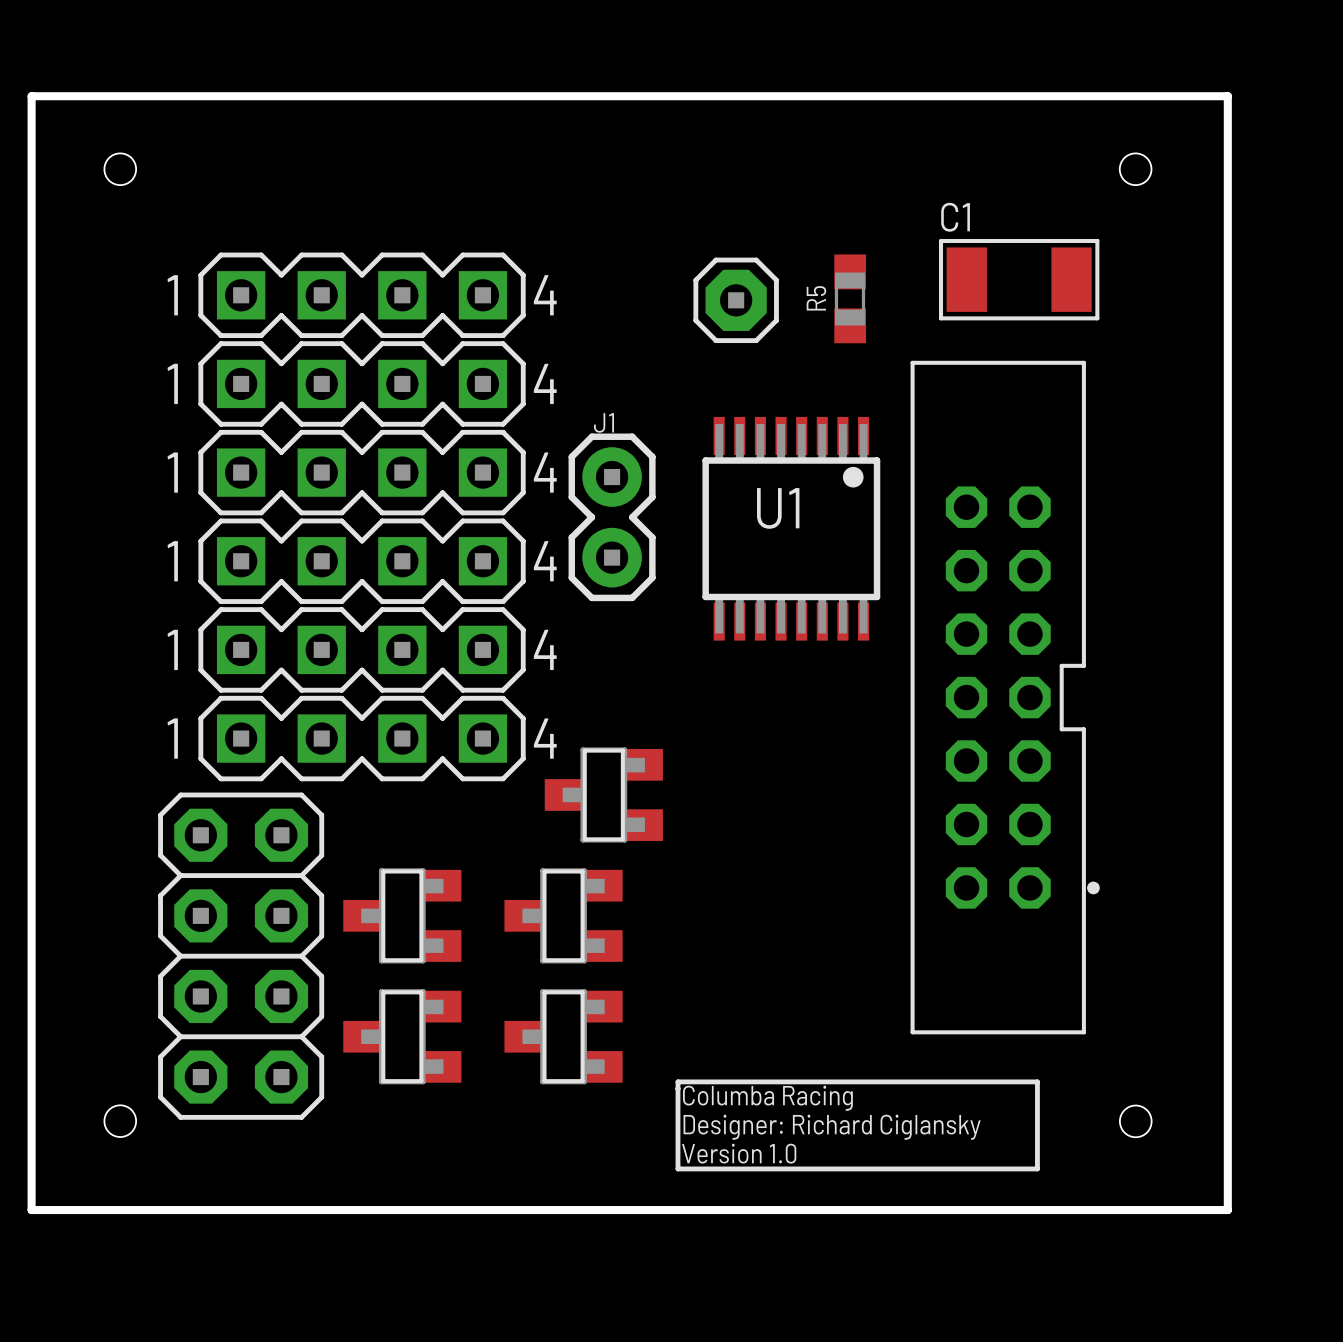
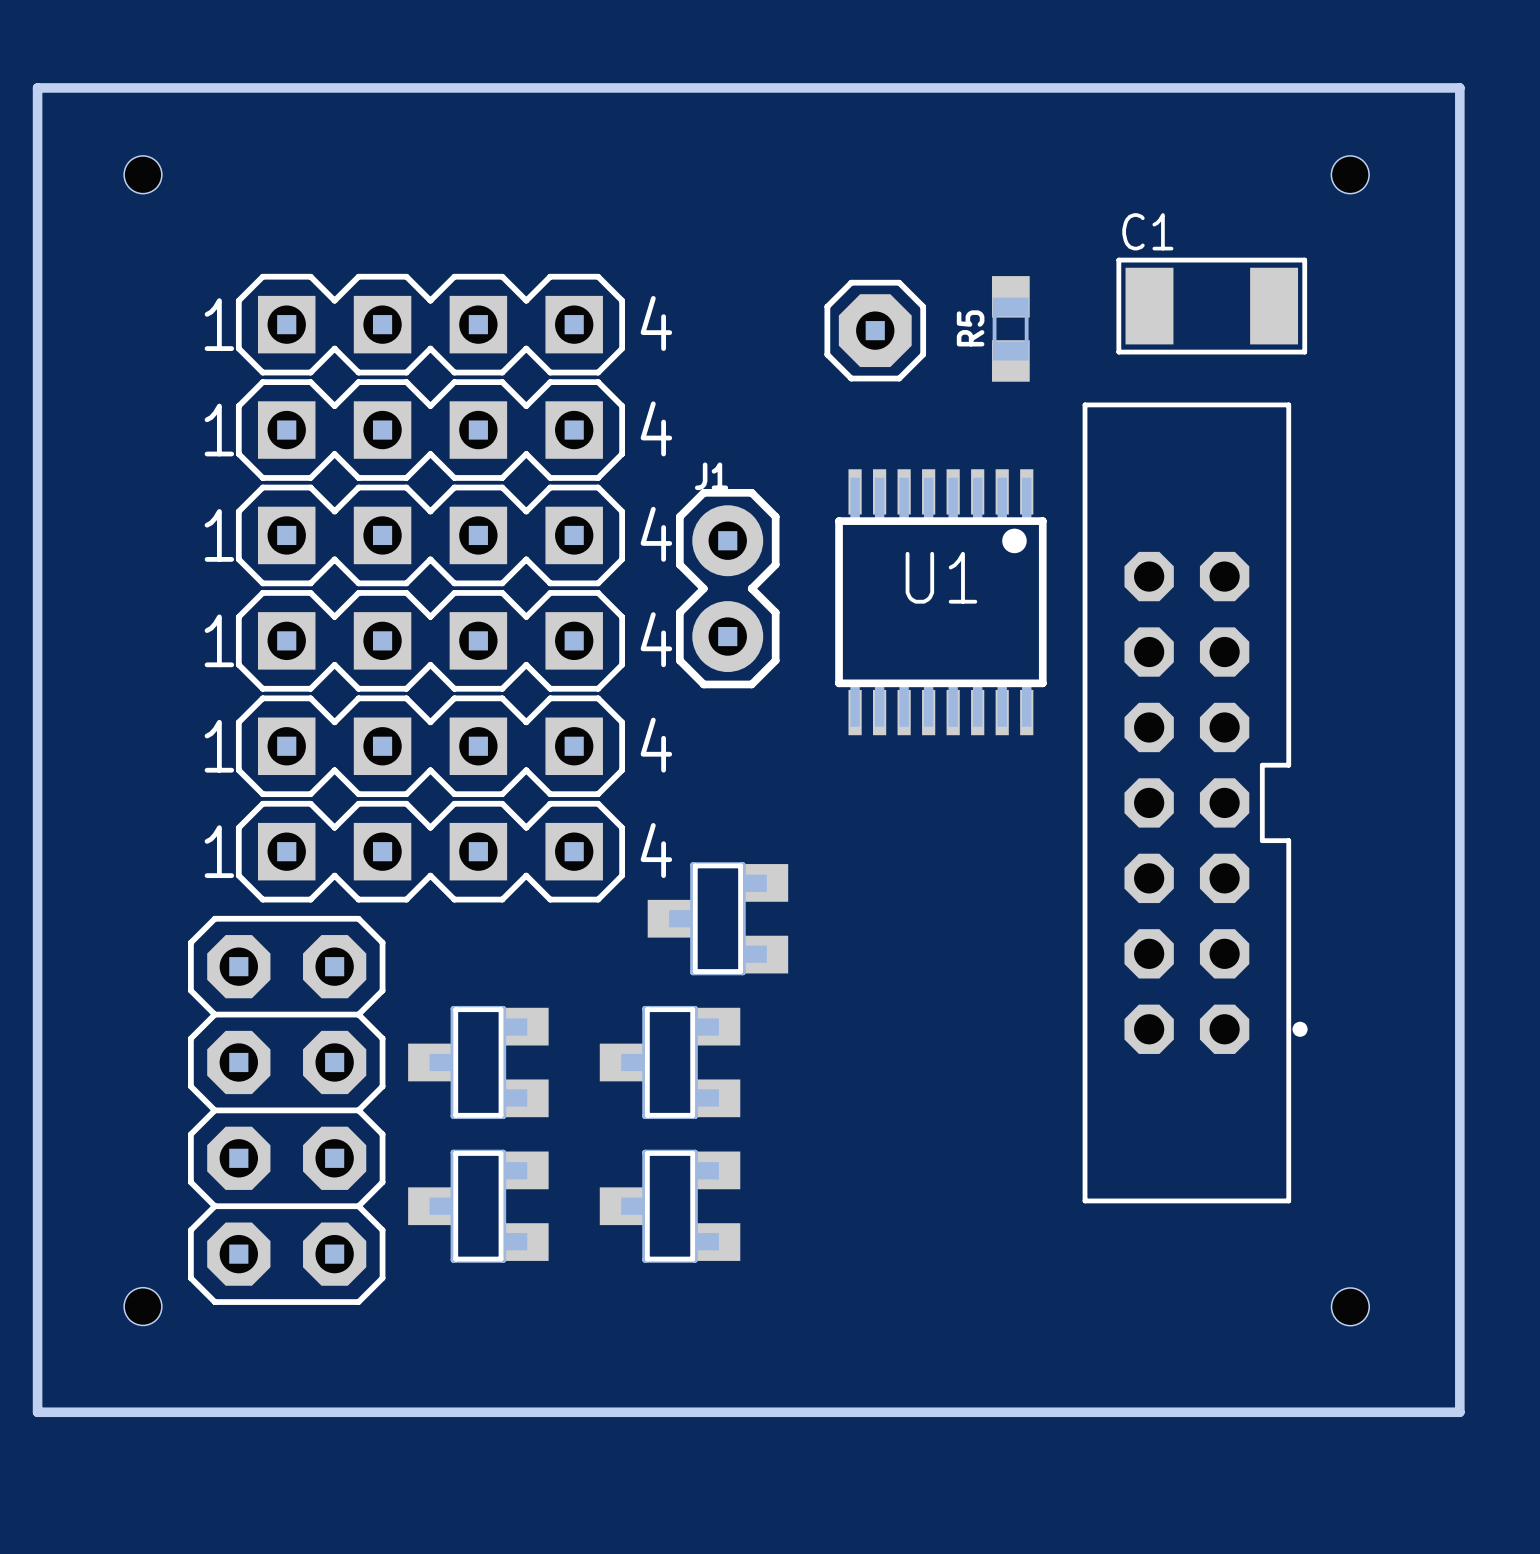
line: (677, 1081) (677, 1168) (1037, 1168) (1037, 1081) (677, 1081) -> none
text: Columba Racing (767, 1098) -> none
text: Designer: Richard Ciglansky (832, 1127) -> none
text: Version 1.0 (739, 1153) -> none

